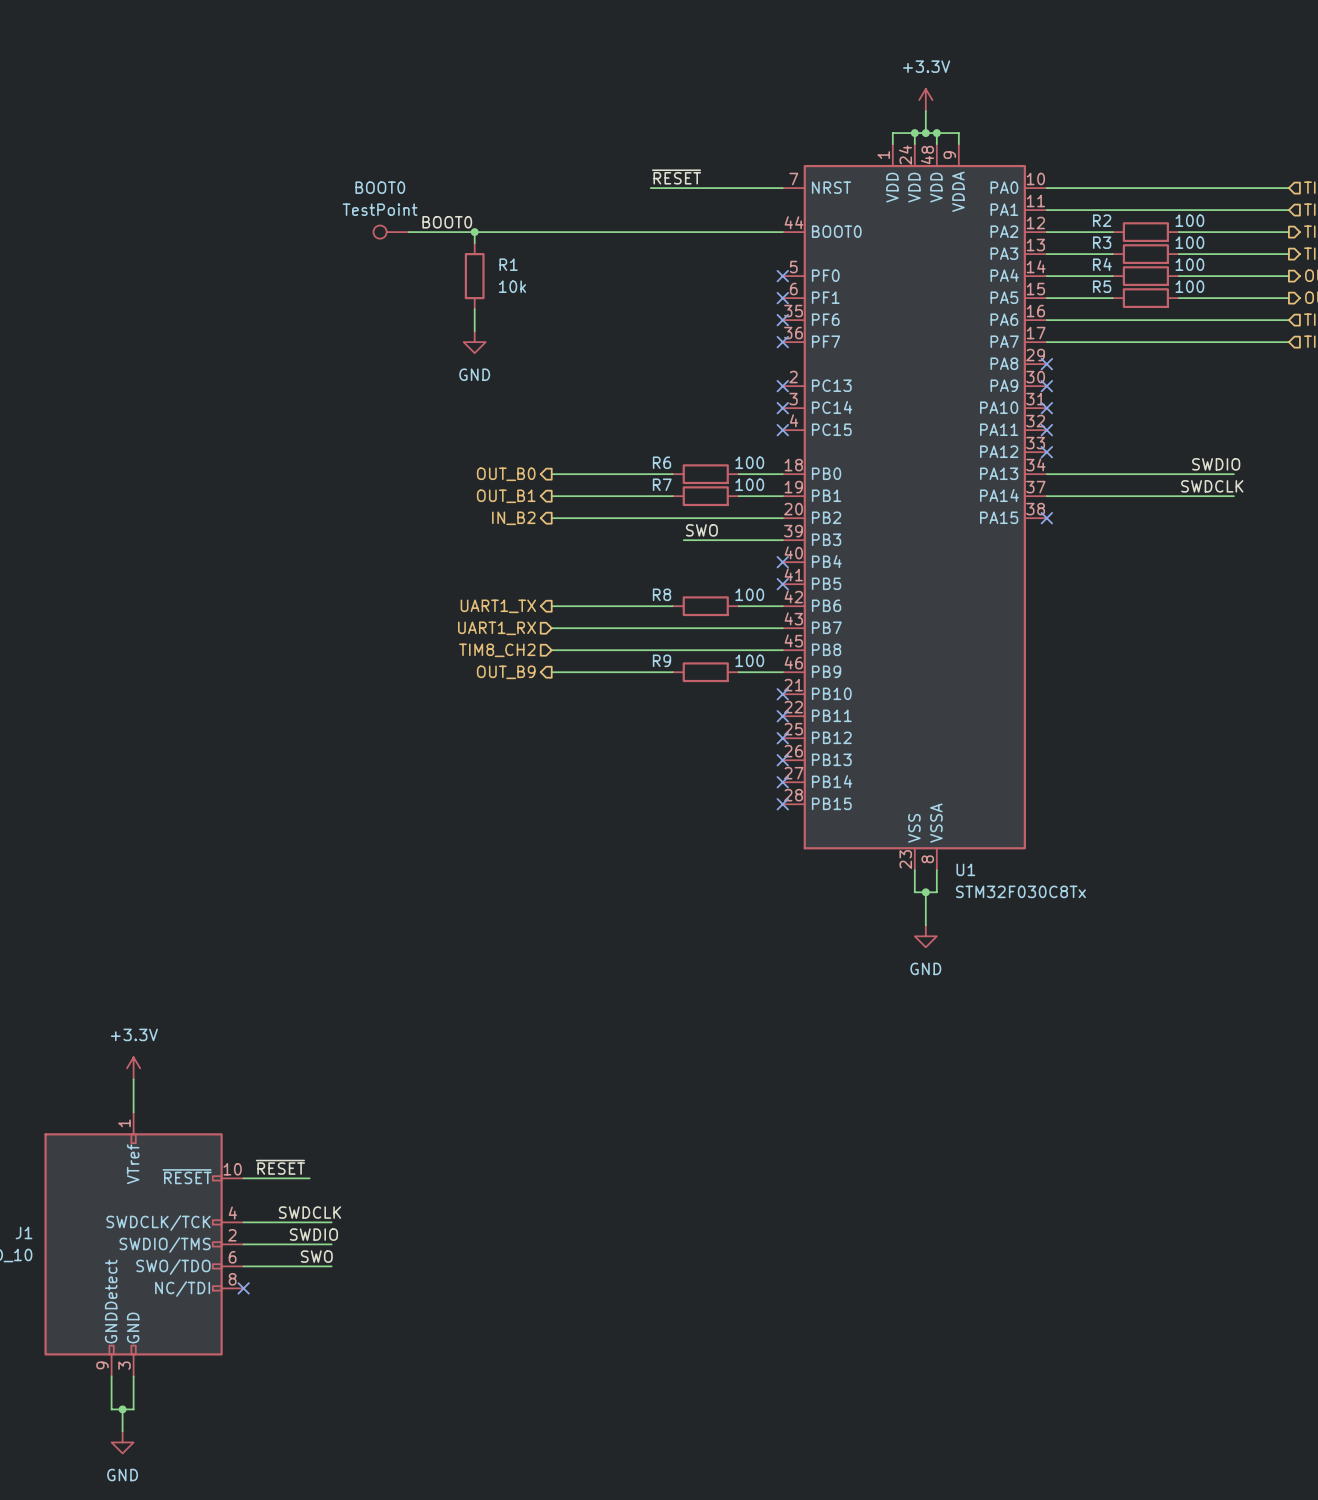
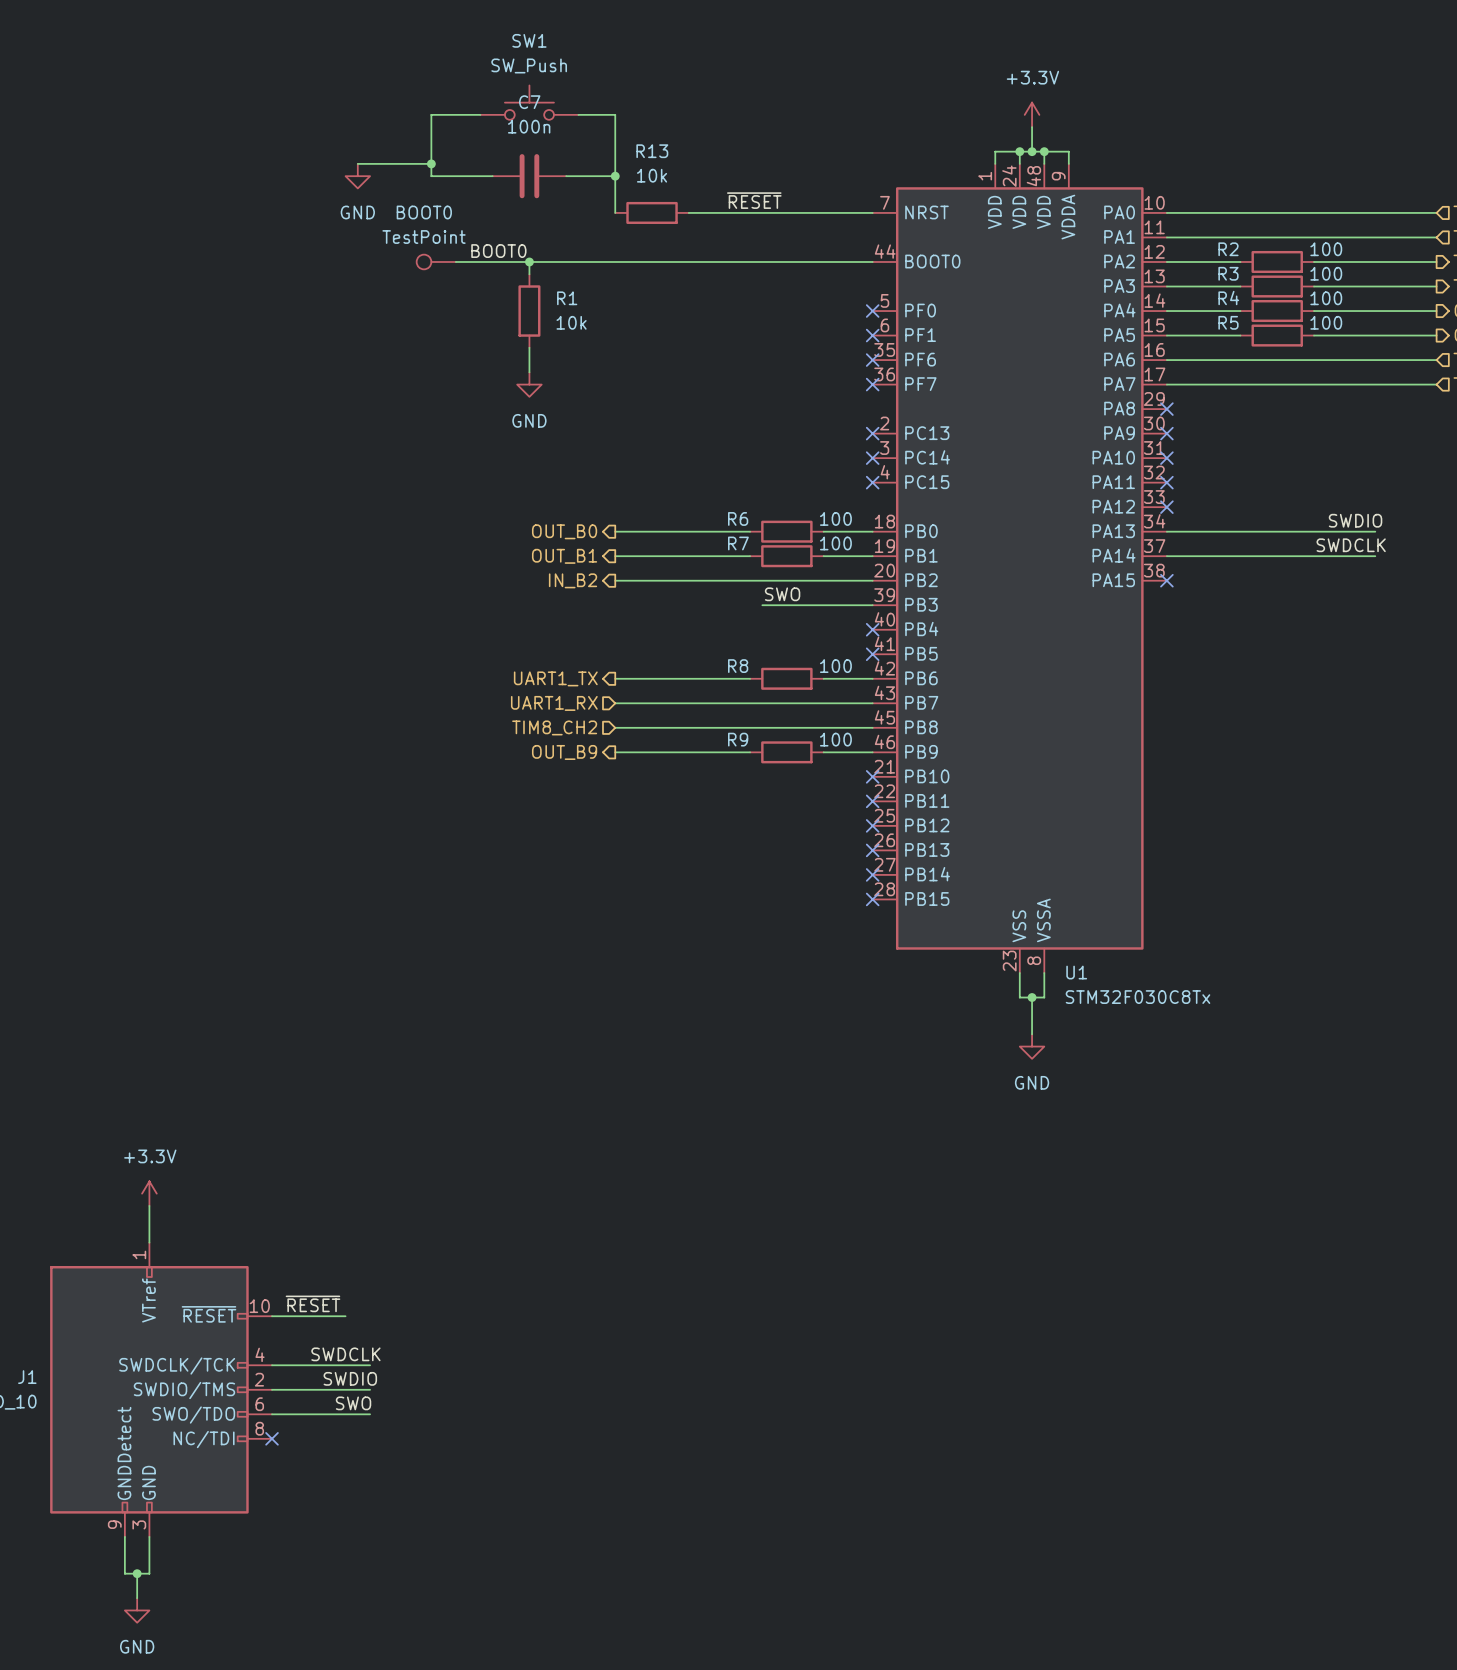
SW1: none -> SW_Push (529, 102)
wire: none -> (480, 114) (431, 114) (431, 176) (492, 176)
wire: none -> (578, 114) (615, 114) (615, 212)
wire: none -> (357, 163) (431, 163)
junction: none -> (431, 163)
power symbol: none -> GND (357, 176)
C7: none -> 100n (529, 176)
wire: none -> (566, 176) (615, 176)
junction: none -> (615, 176)
R13: none -> 10k (652, 212)
wire: none -> (688, 212) (725, 212)

